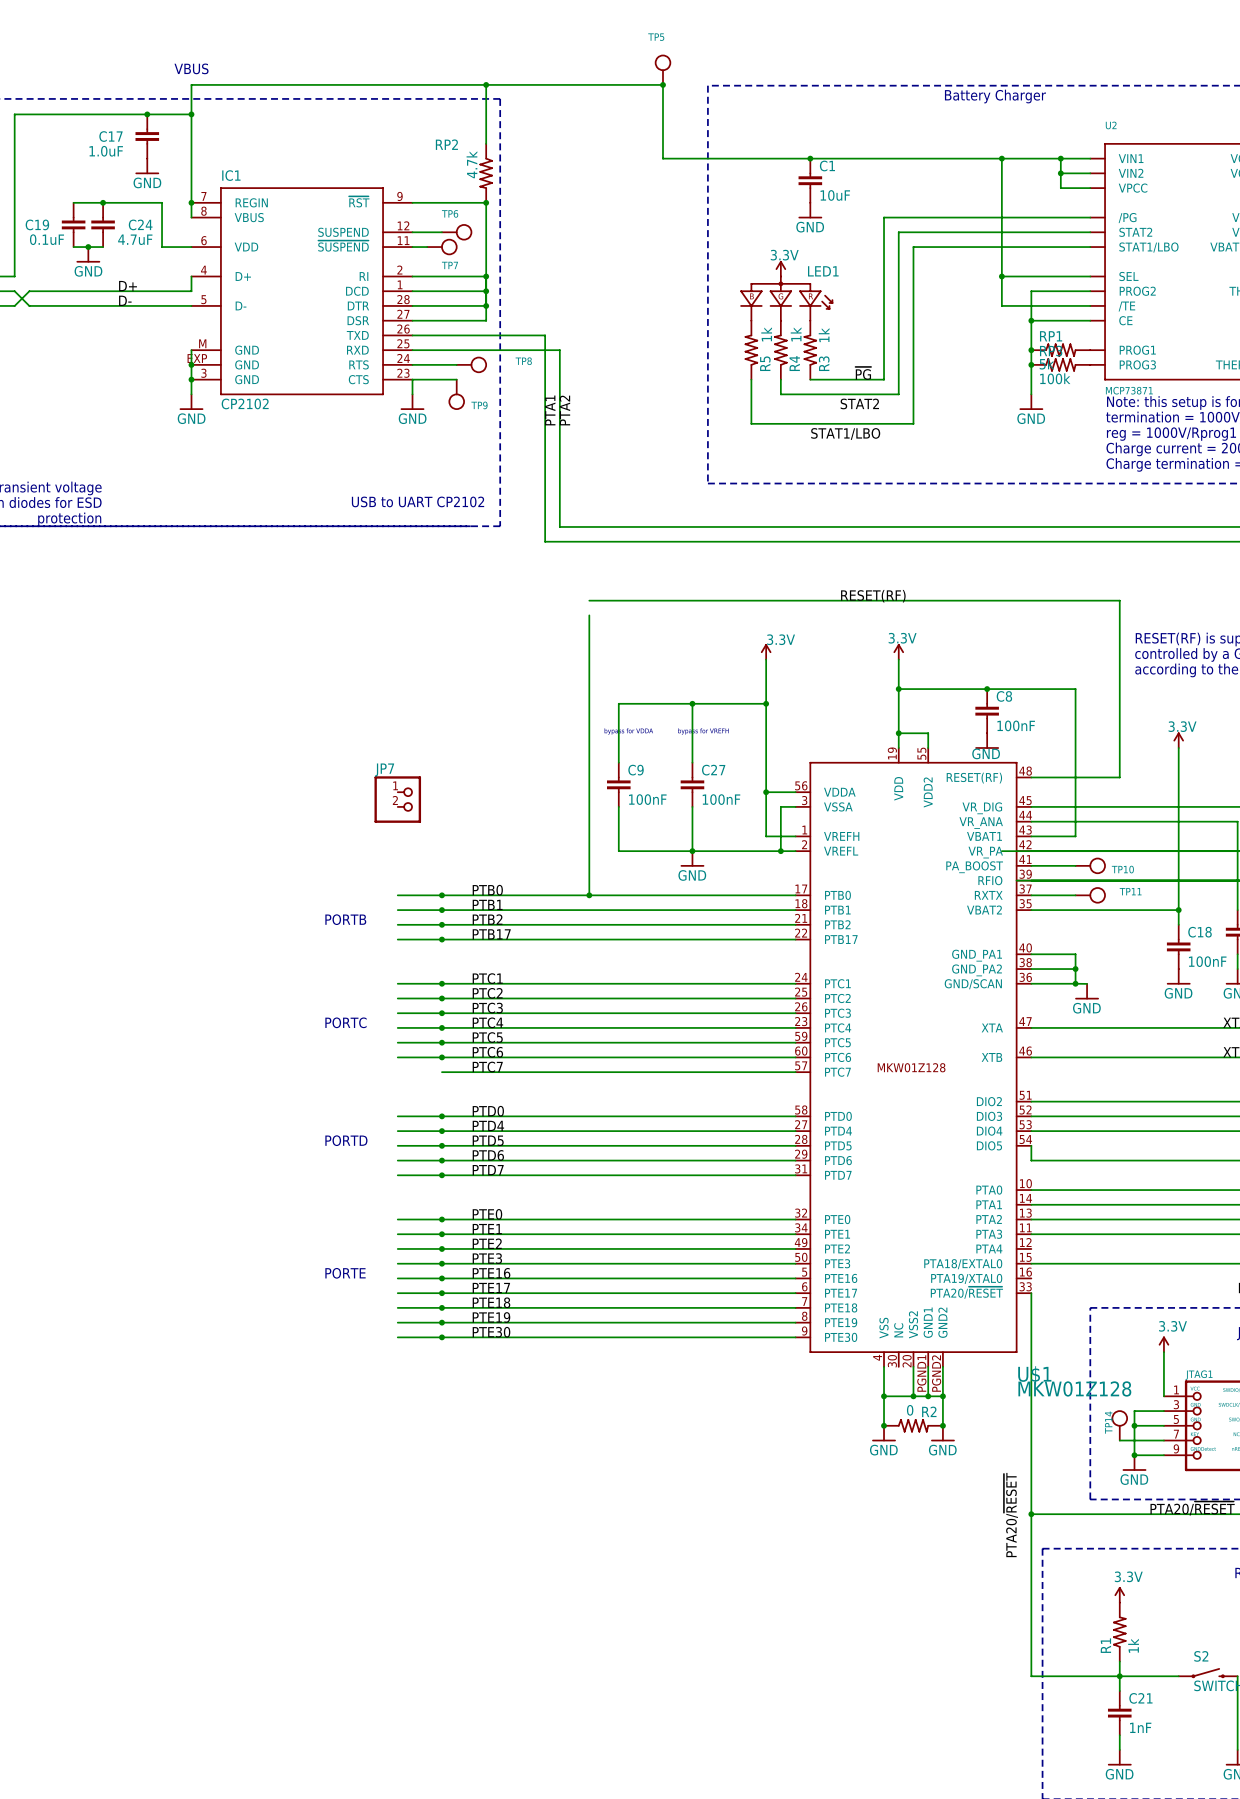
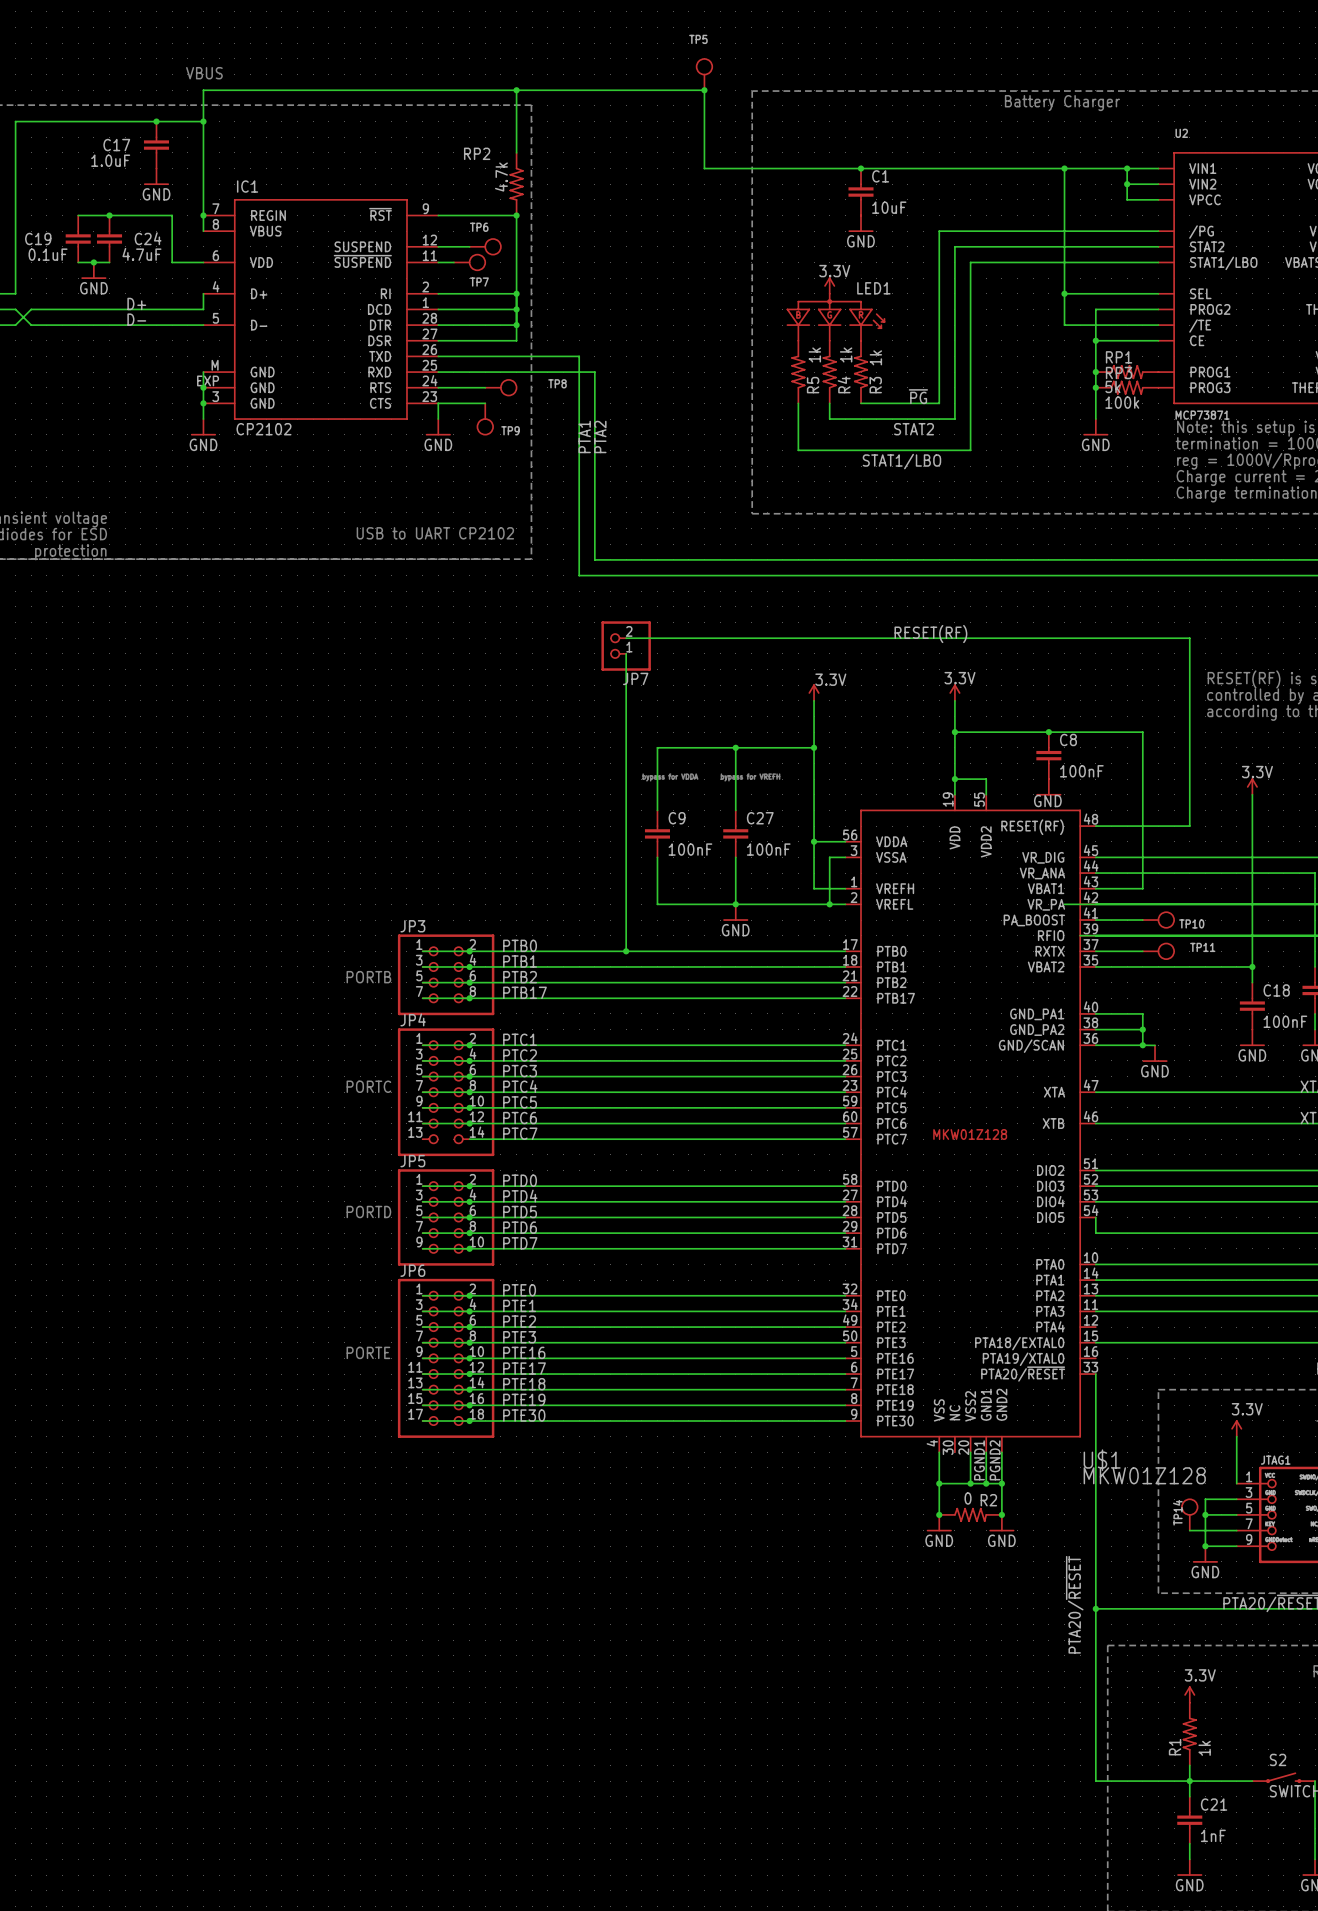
JP7 rotation: 0° (397, 799) -> 180° (626, 646)
JP7 position: (397, 799) -> (626, 646)
JP3: none -> (446, 974)
JP4: none -> (446, 1092)
JP5: none -> (446, 1217)
JP6: none -> (446, 1358)

